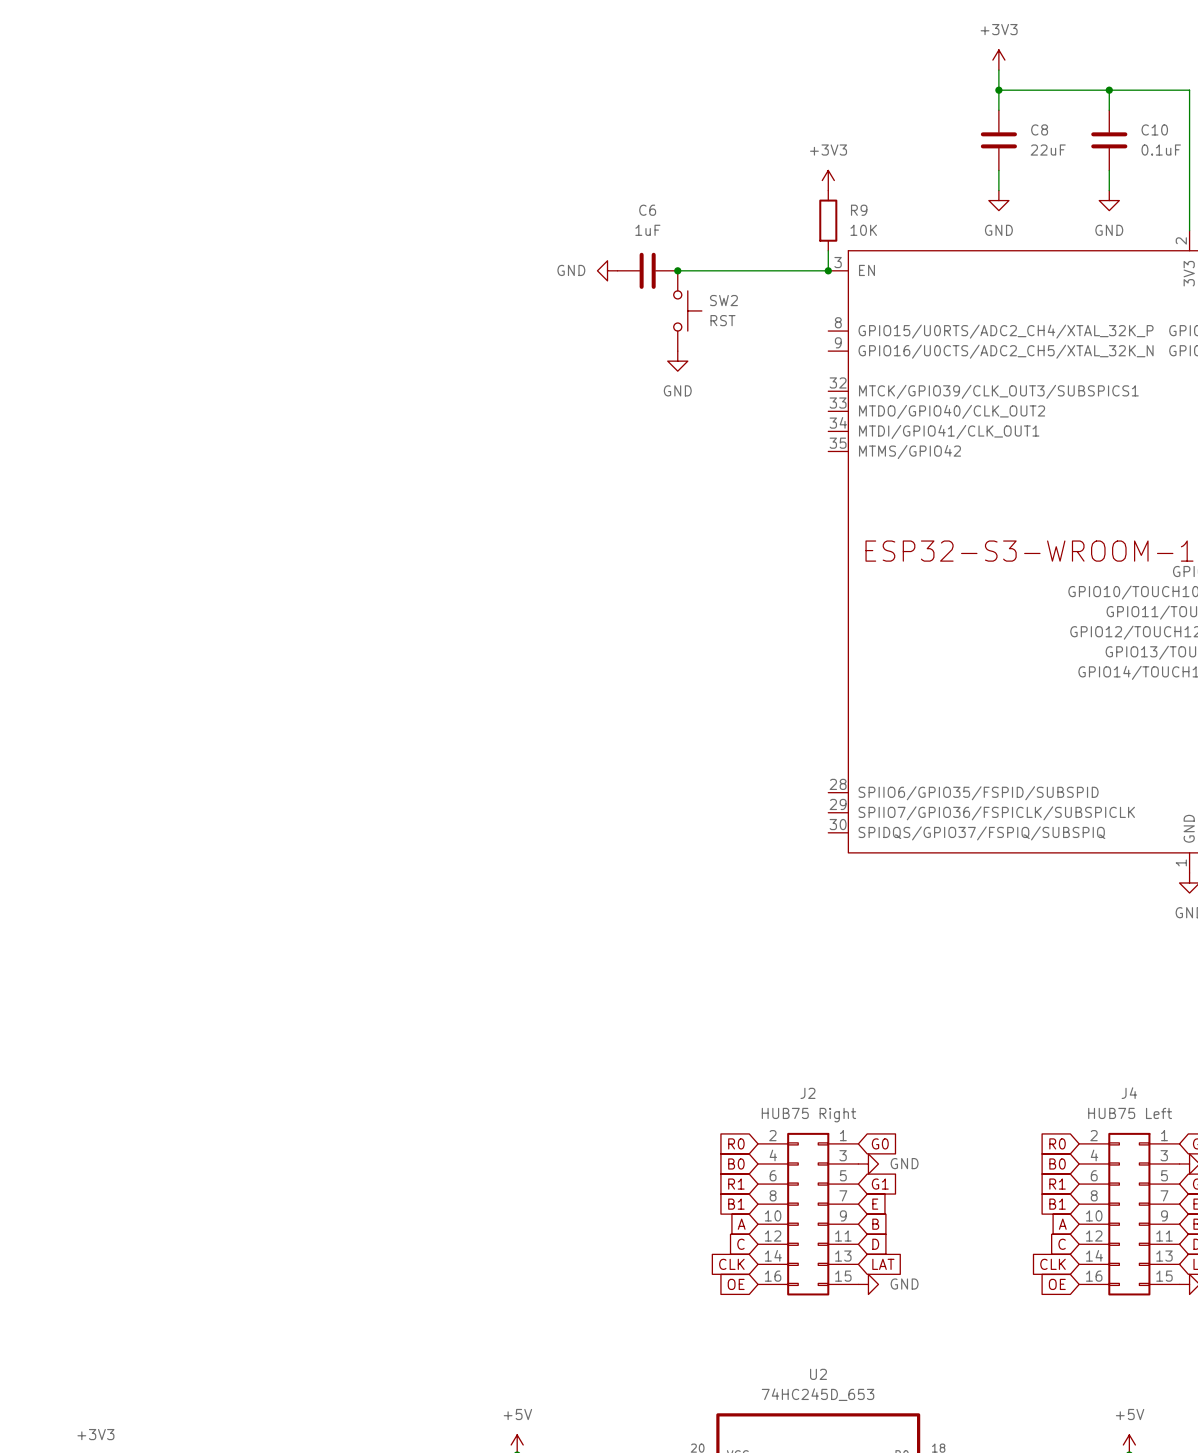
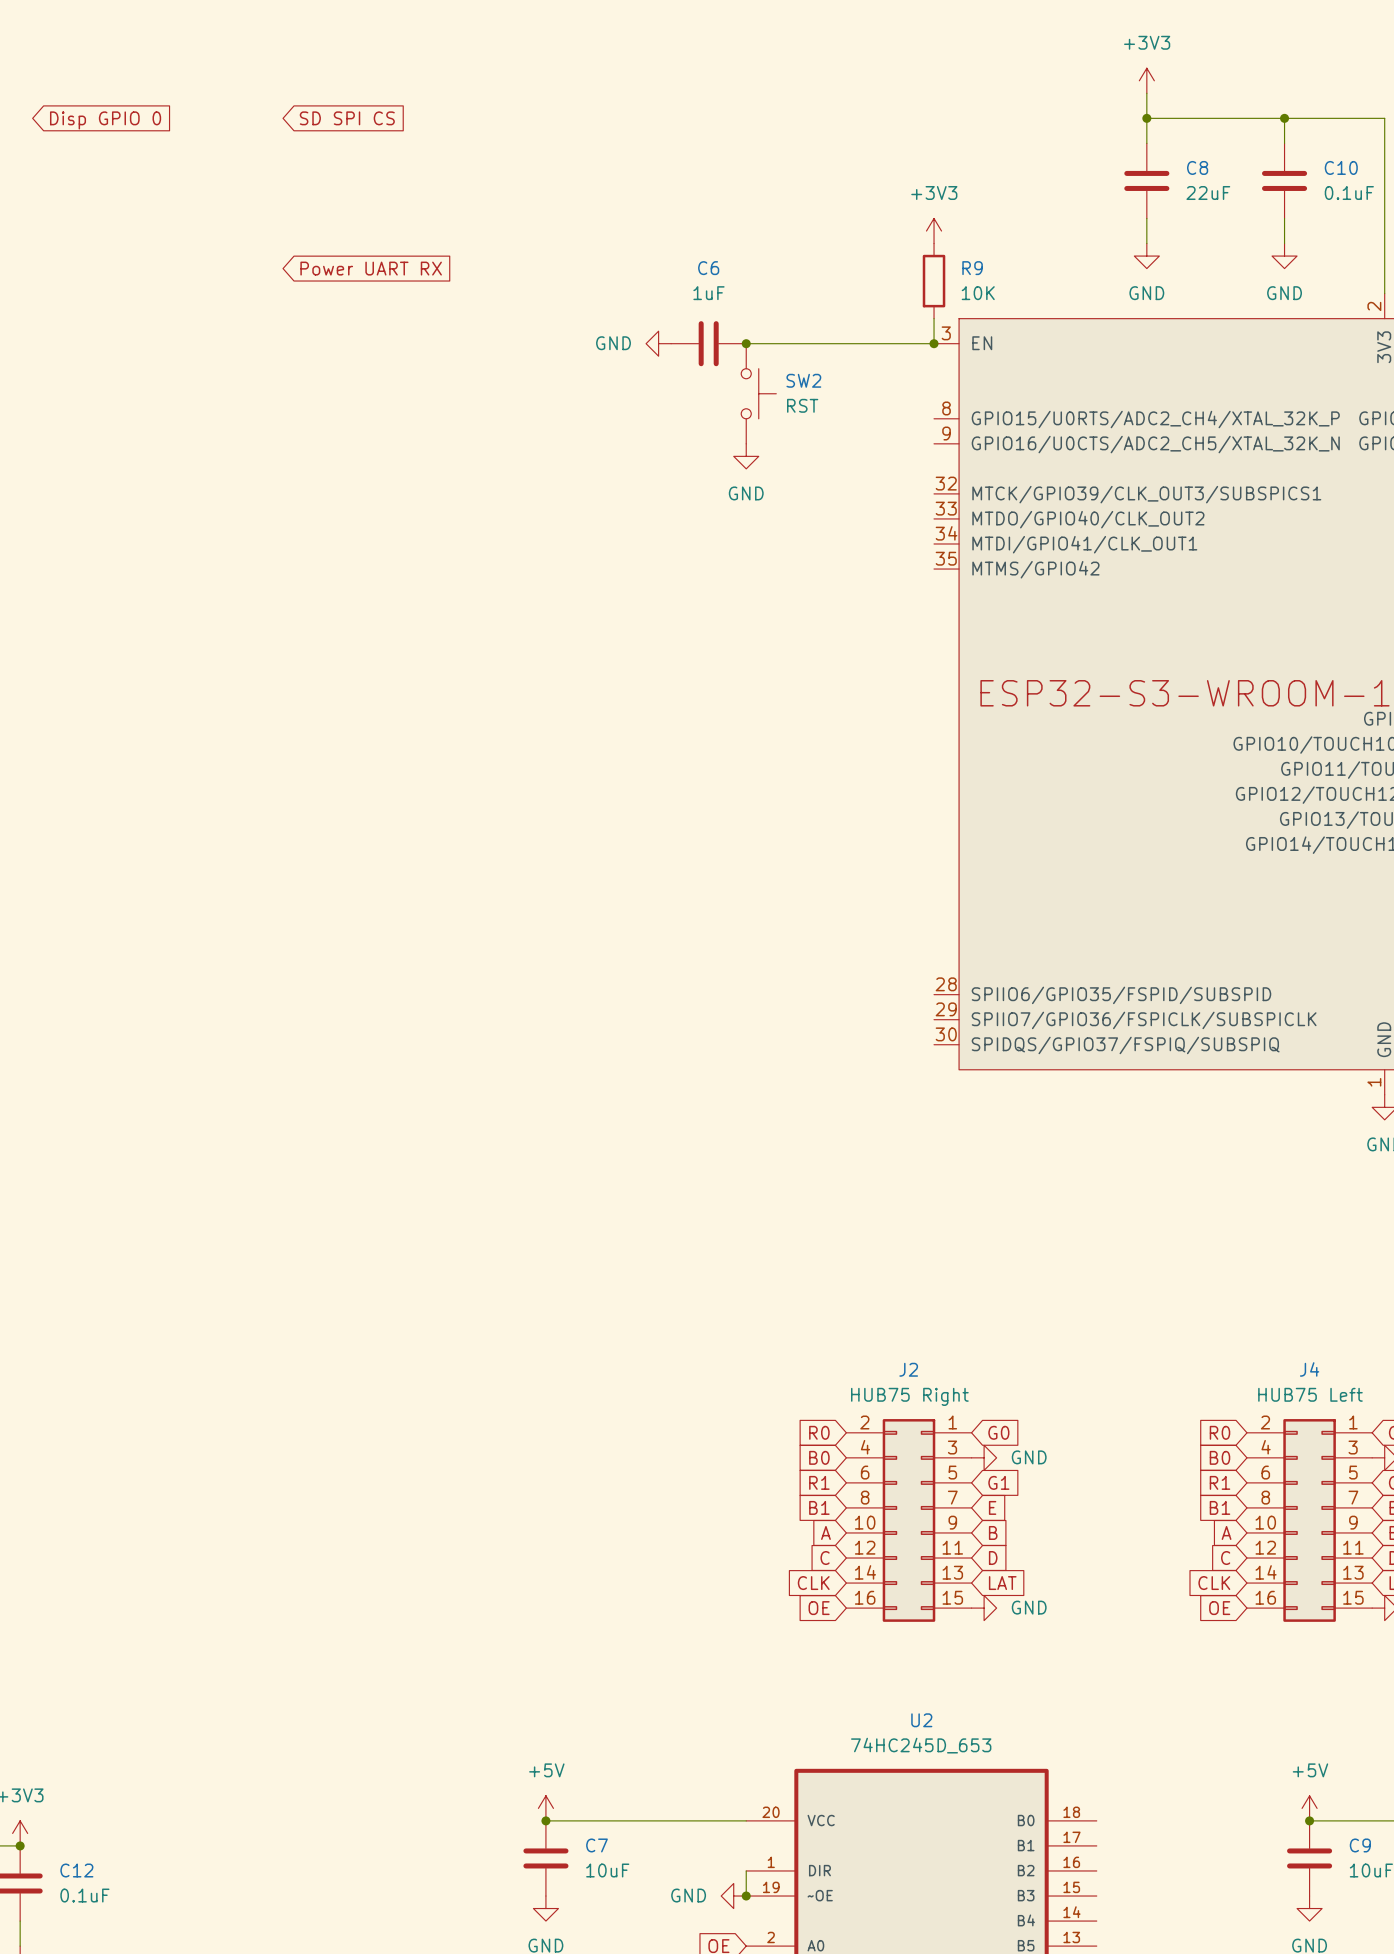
global label: none -> SD SPI CS (347, 118)
global label: none -> Disp GPIO 0 (105, 120)
global label: none -> Power UART RX (371, 268)

